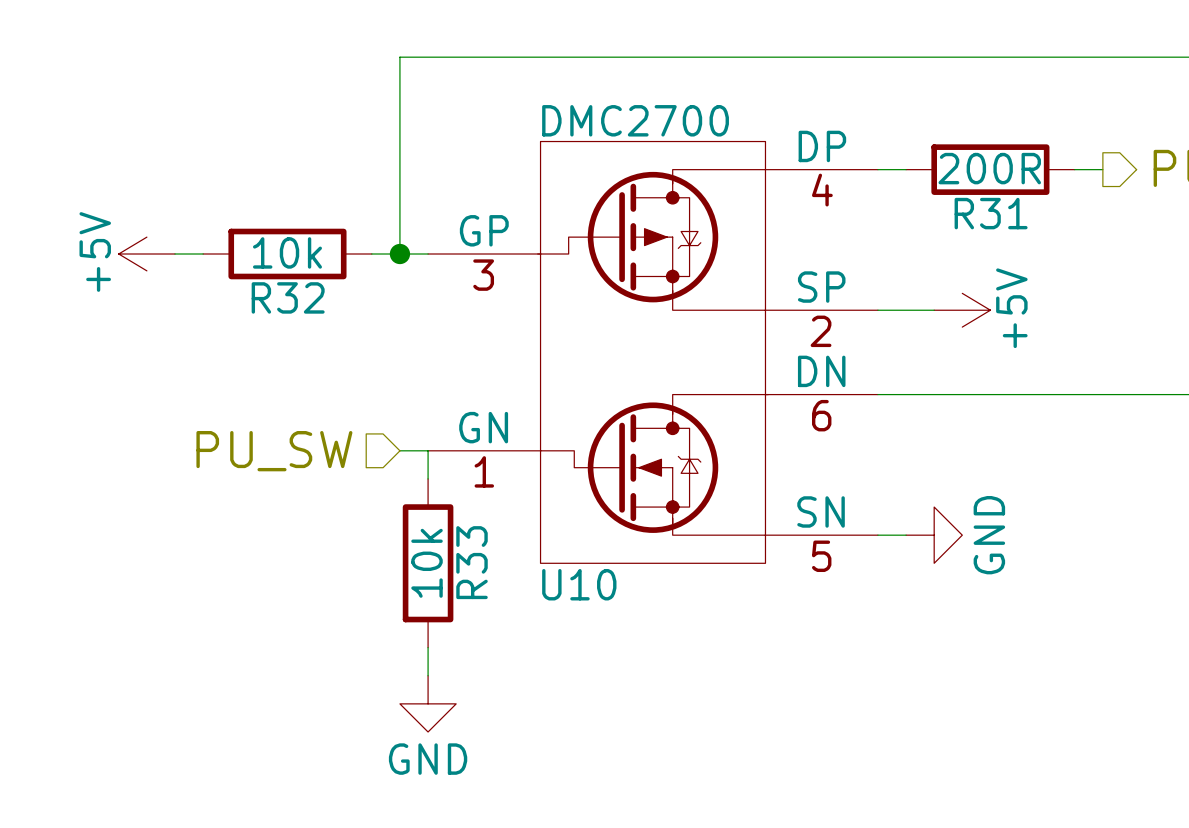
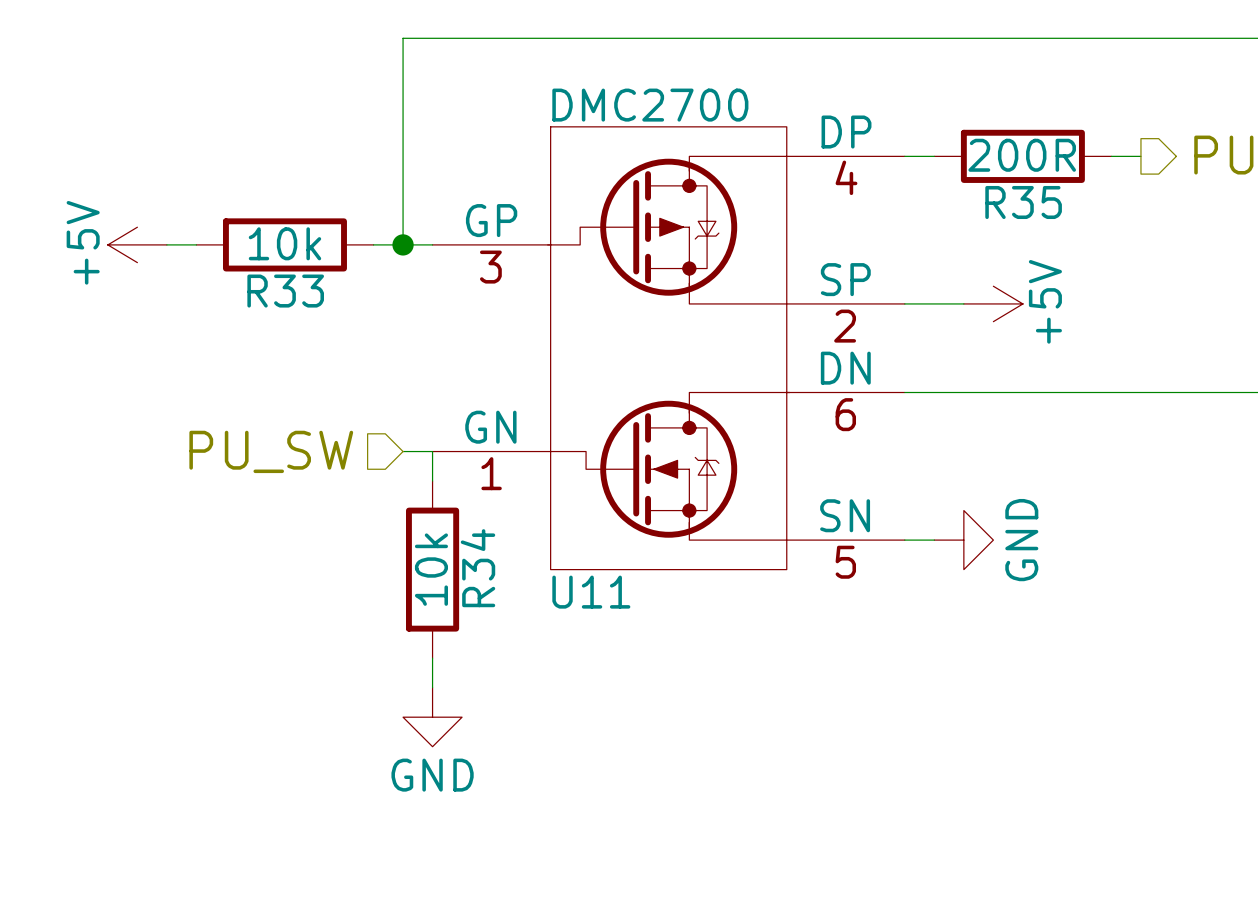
R31 name: R31 (991, 213) -> R35 (1023, 202)
R32 name: R32 (288, 297) -> R33 (285, 291)
R33 name: R33 (472, 562) -> R34 (477, 568)
U10 name: U10 (579, 584) -> U11 (591, 592)

